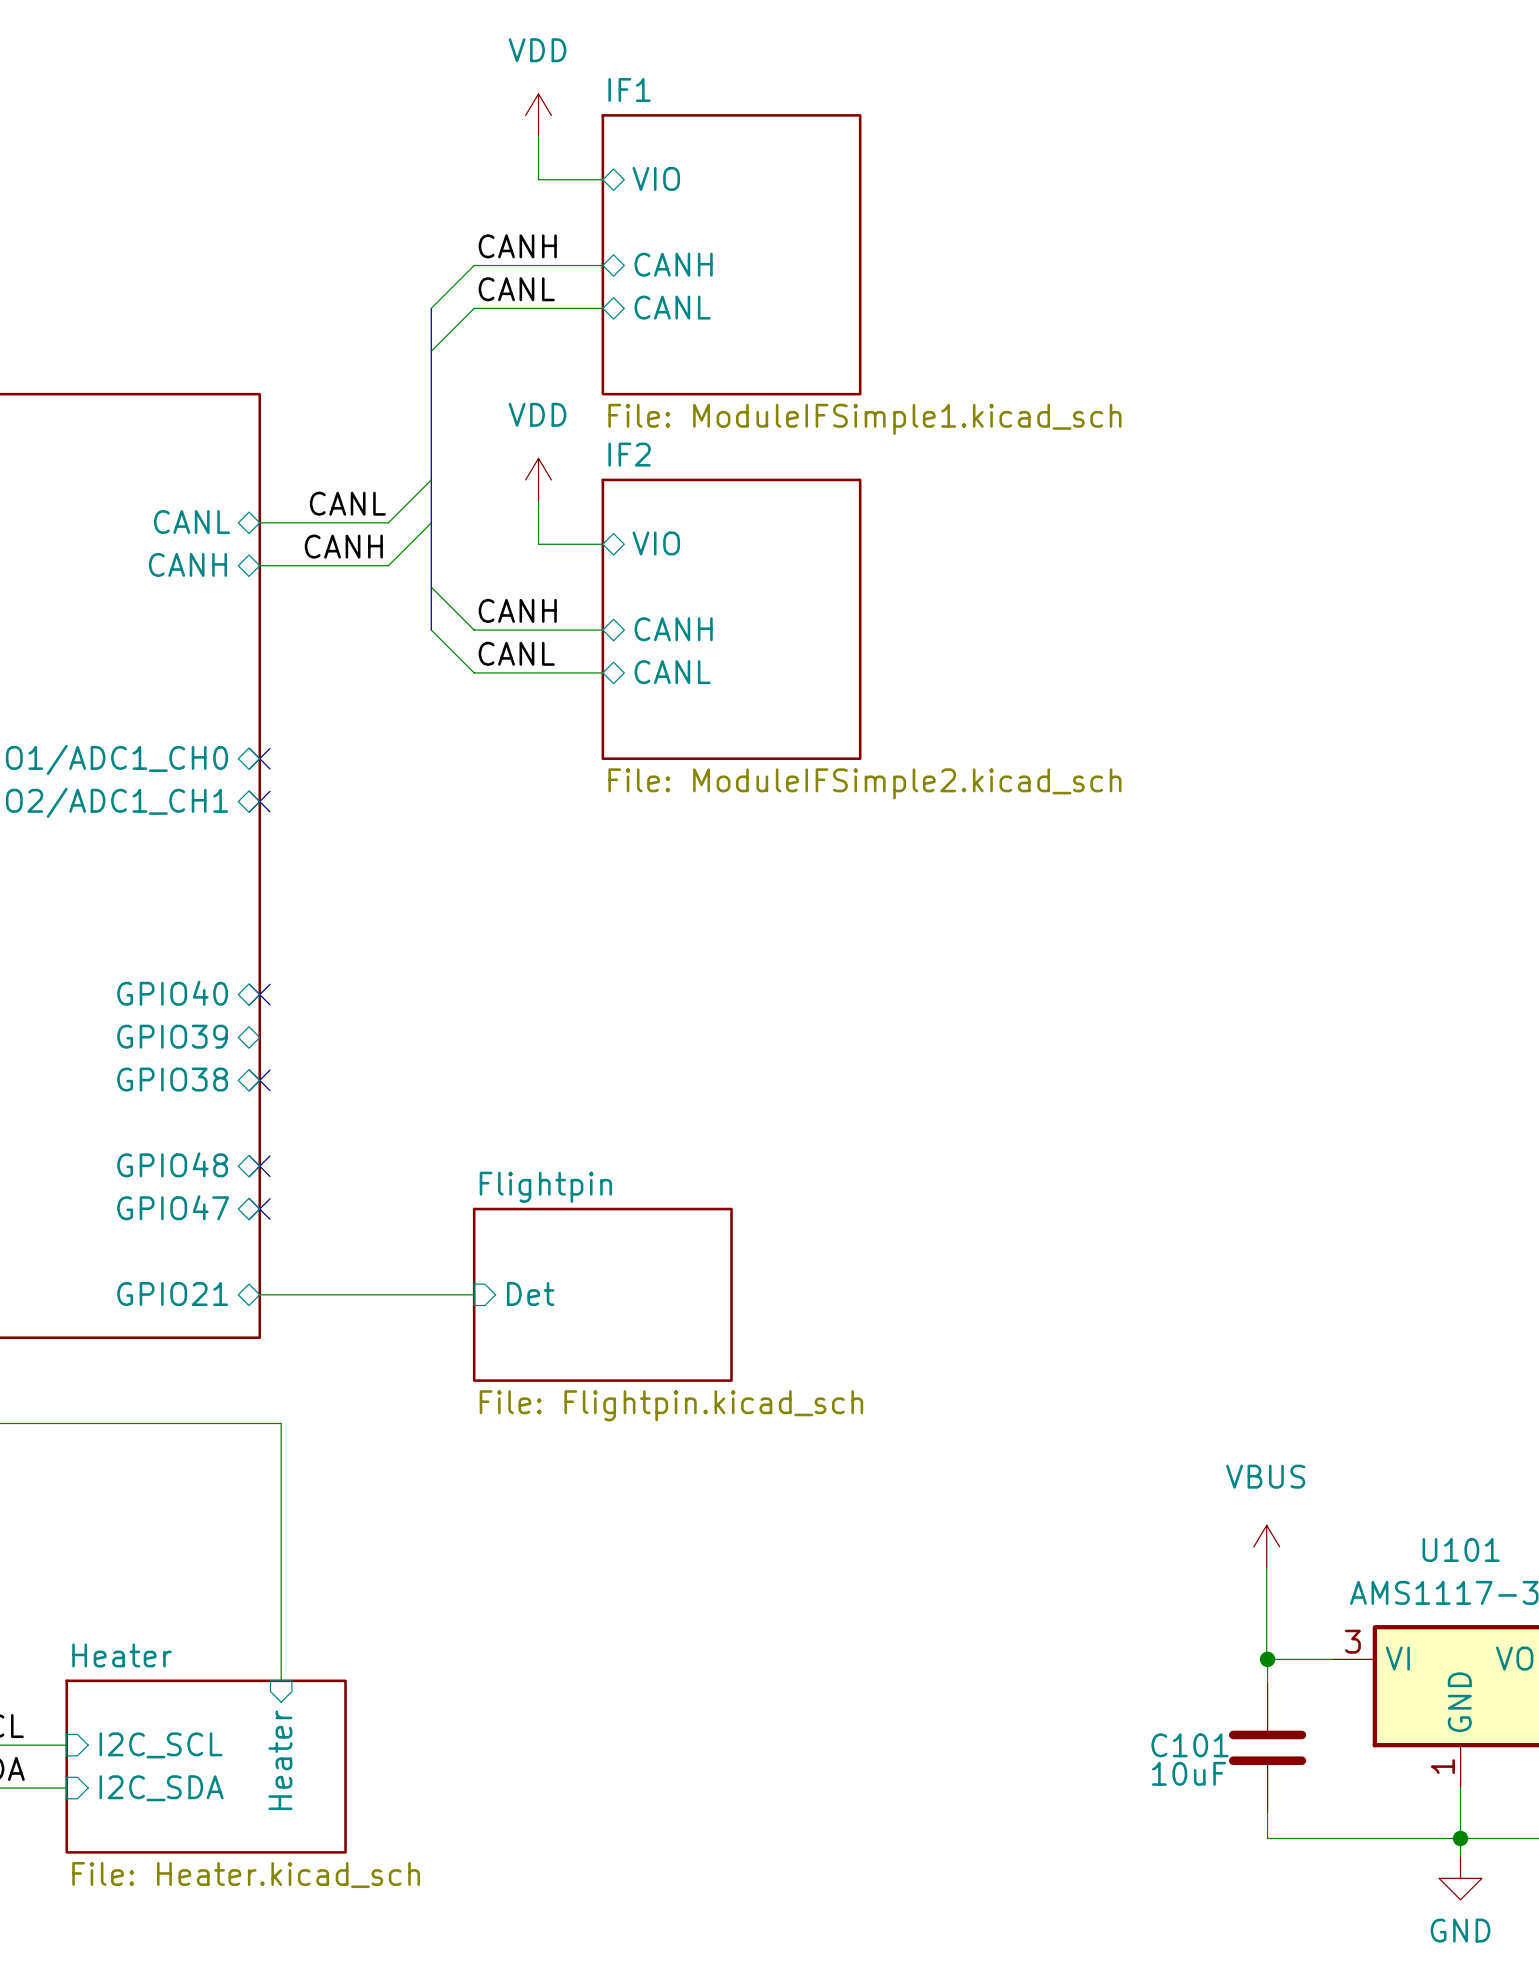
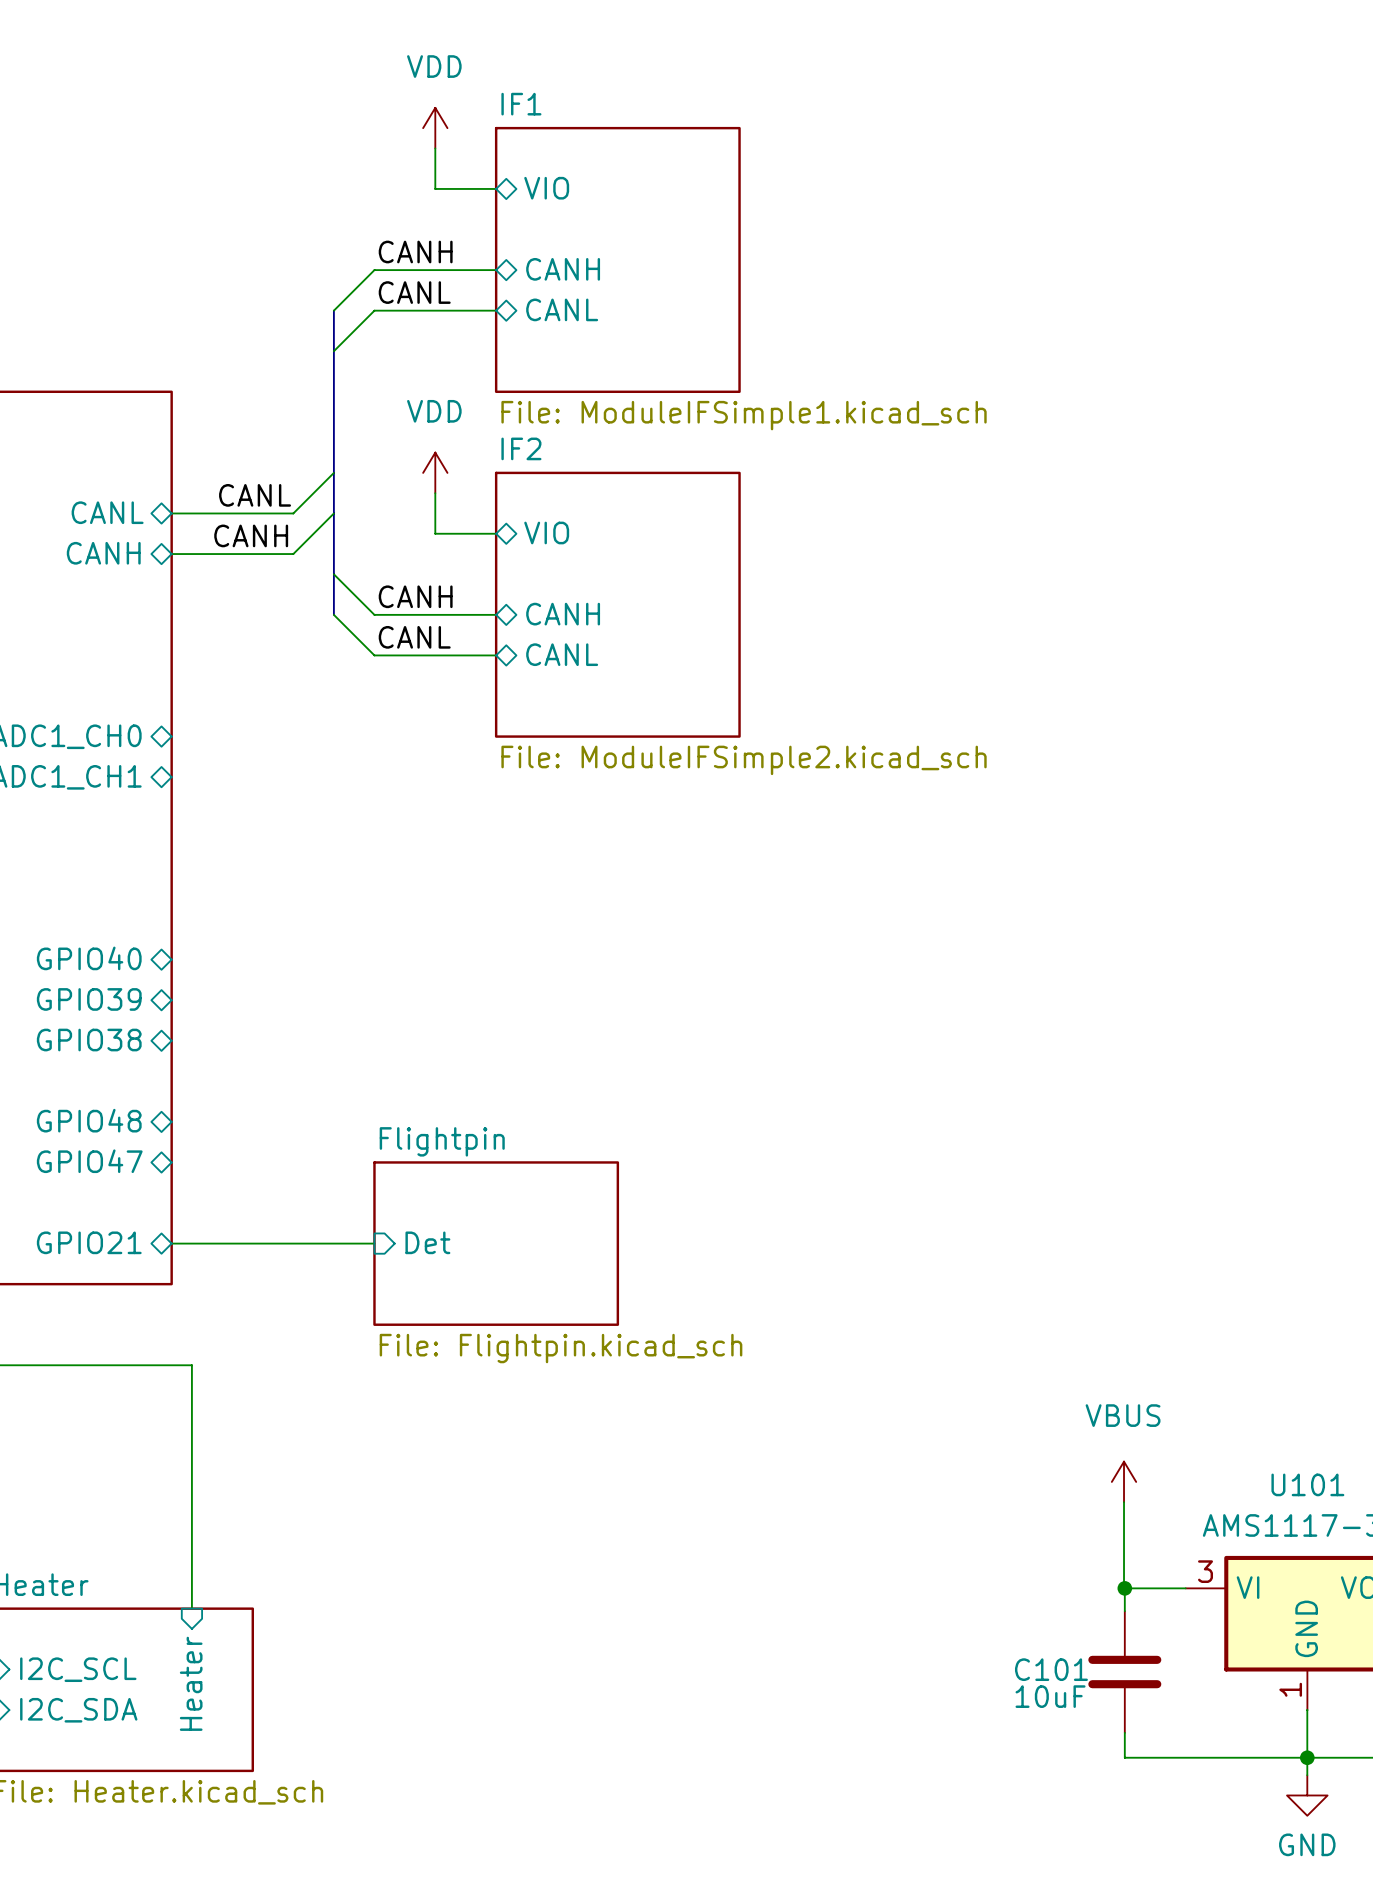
no-connect mark: (259, 758) -> none
no-connect mark: (259, 801) -> none
no-connect mark: (259, 994) -> none
no-connect mark: (259, 1080) -> none
no-connect mark: (259, 1166) -> none
no-connect mark: (259, 1209) -> none

